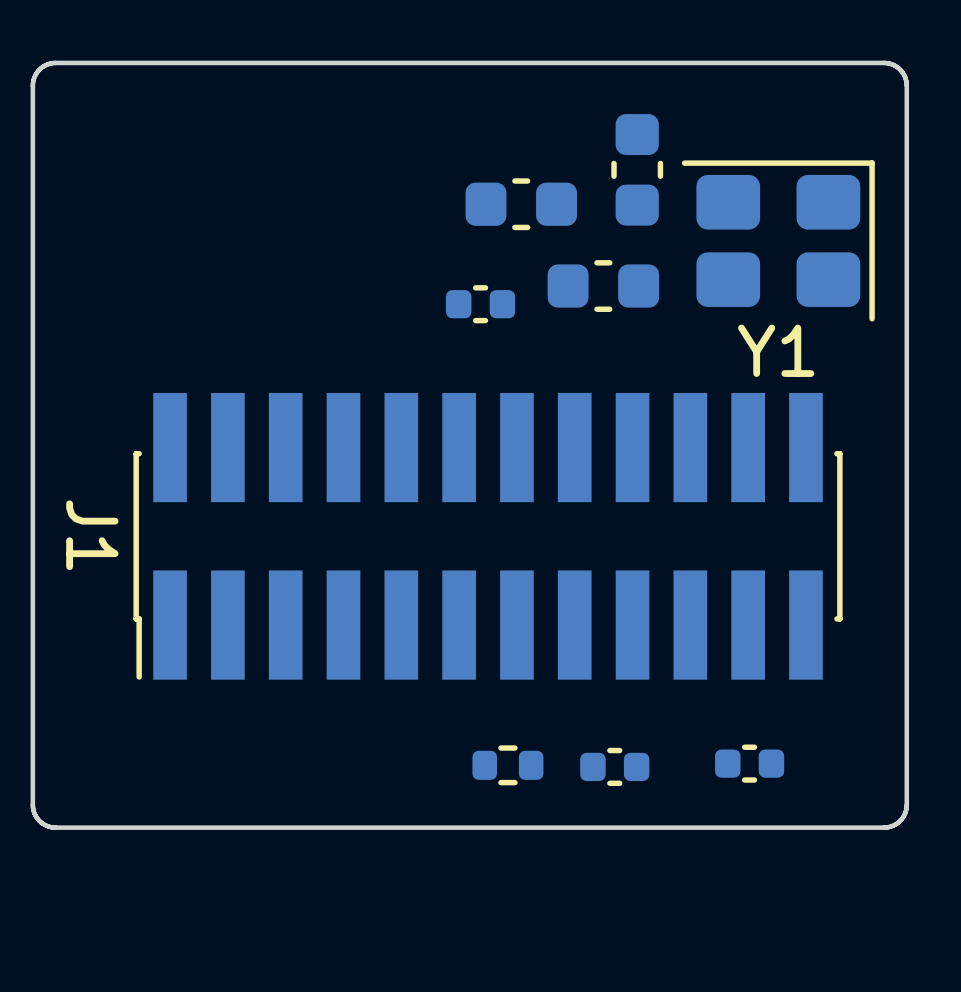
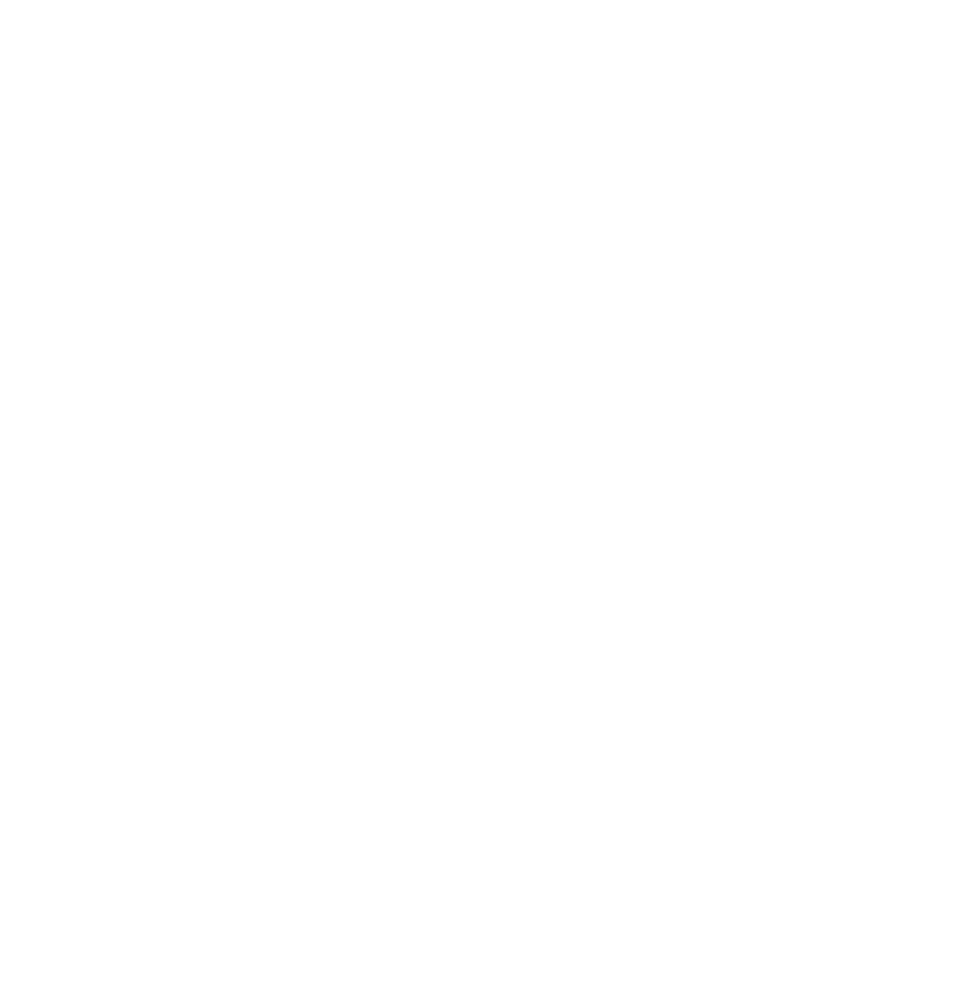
board edge: (886, 63) (894, 65) (901, 71) (906, 85) (906, 804) (904, 815) (898, 822) (884, 827) (55, 827) (44, 824) (38, 819) (32, 804) (32, 85) (35, 74) (41, 68) (55, 62) (886, 63) -> none
part: (637, 169) -> none
part: (521, 204) -> none
Y1: (778, 240) -> none
part: (603, 286) -> none
part: (480, 304) -> none
J1: (488, 536) -> none
part: (749, 763) -> none
part: (507, 765) -> none
part: (614, 766) -> none

